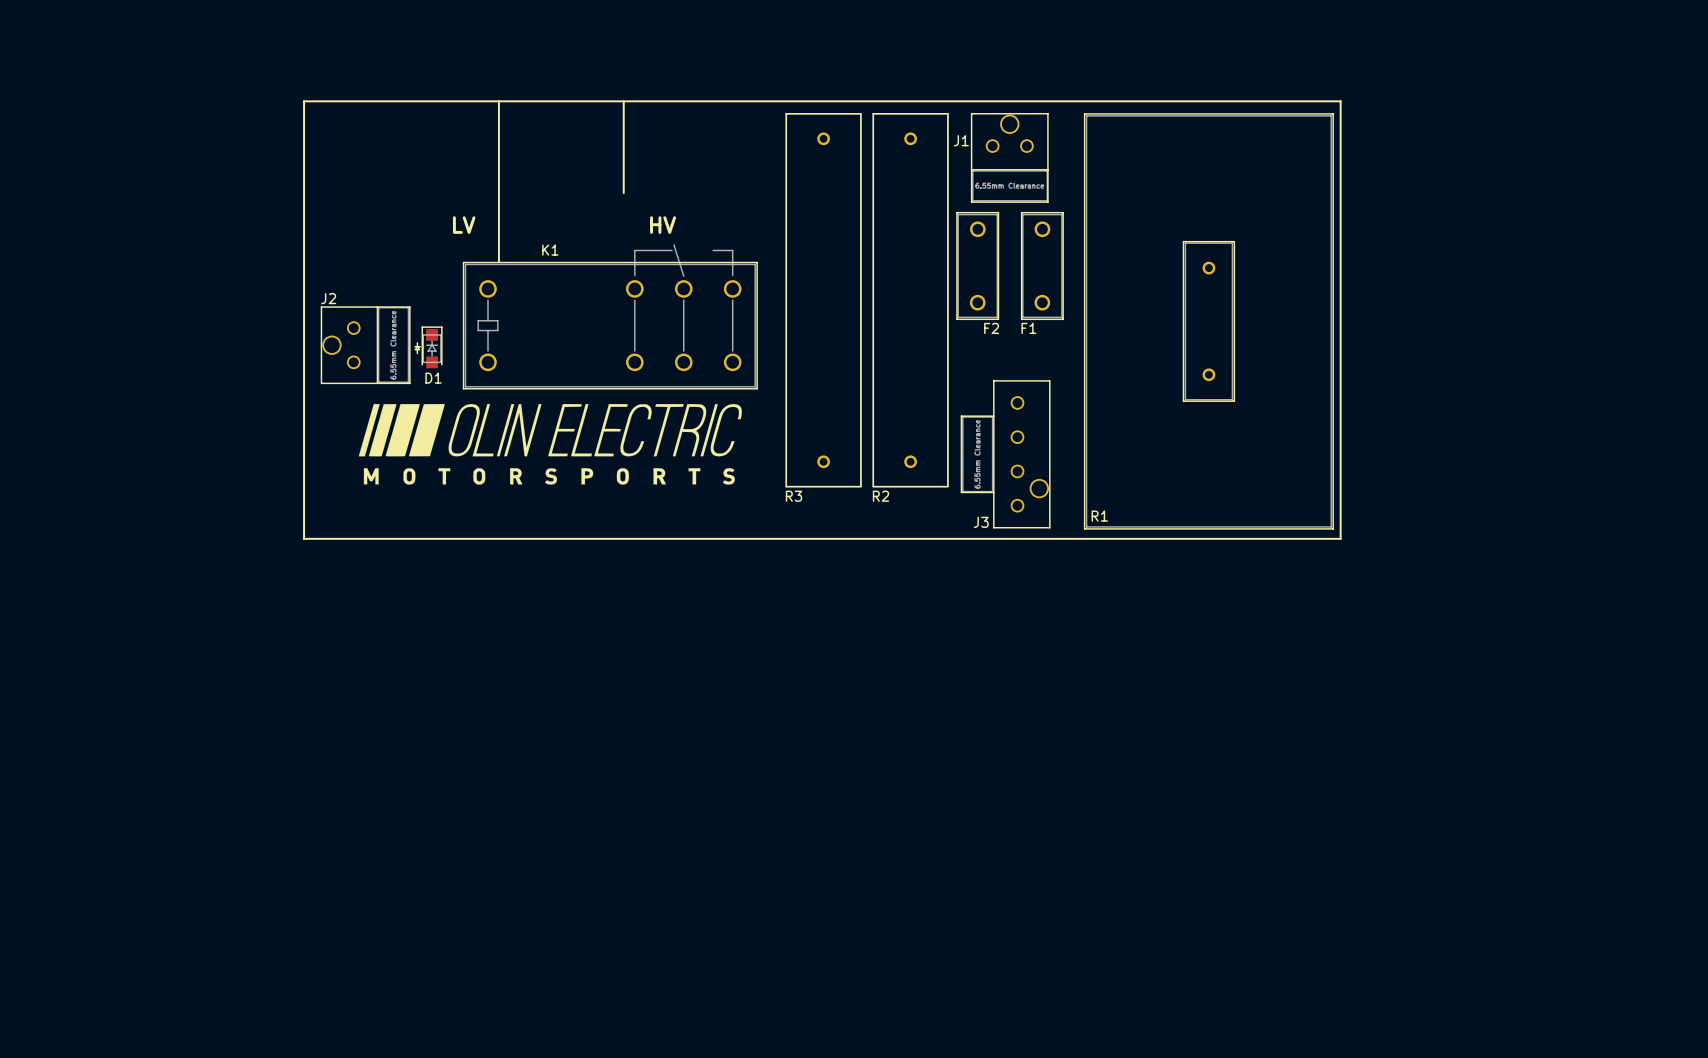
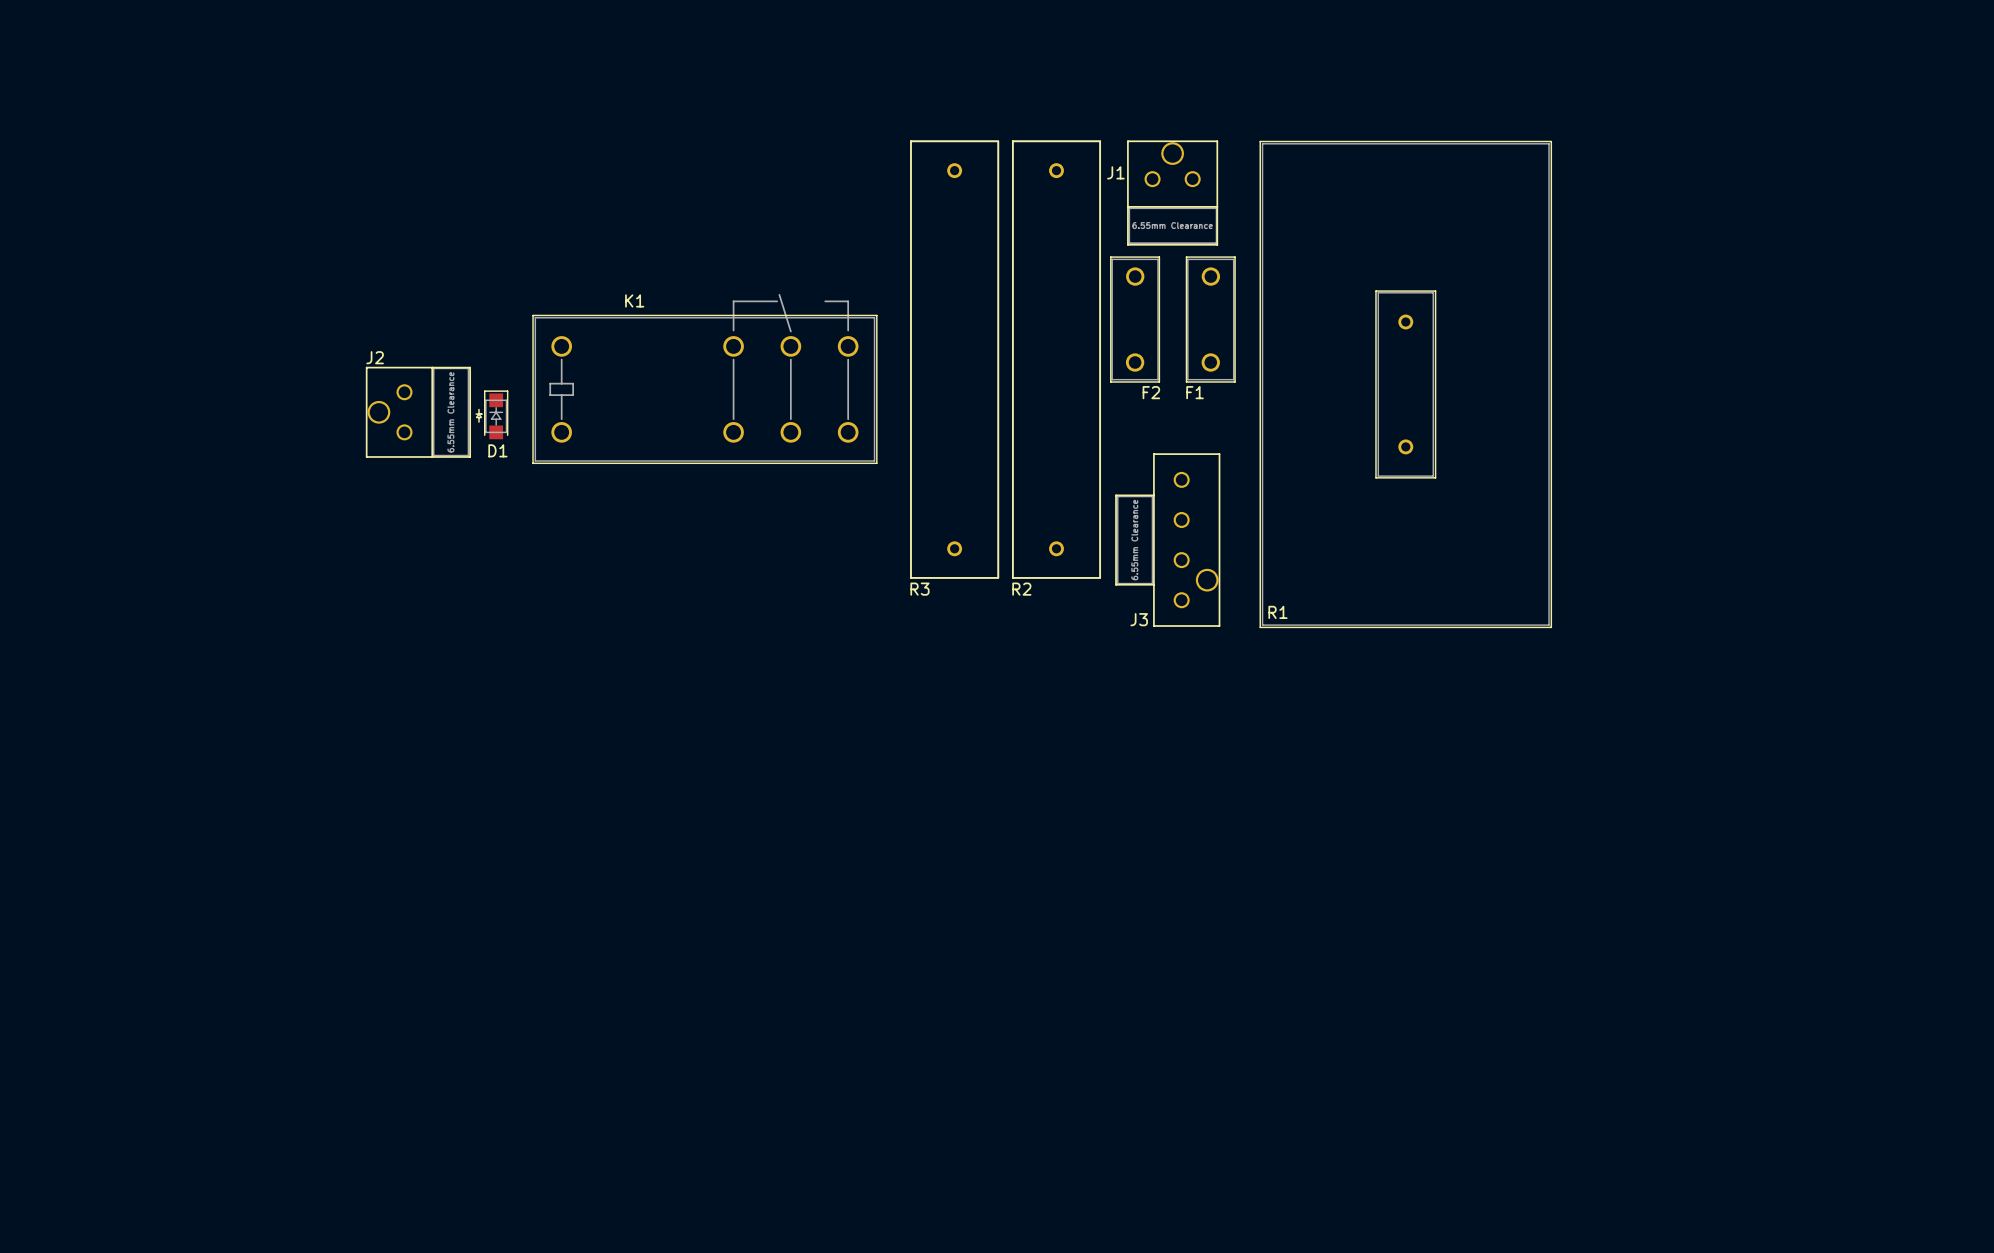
line: (304, 101) (304, 538) (1340, 538) (1340, 101) (304, 101) -> none
line: (498, 101) (498, 262) -> none
line: (623, 101) (623, 193) -> none
text: LV (464, 225) -> none
text: HV (663, 225) -> none
drawing: [358, 404, 742, 485] -> none

